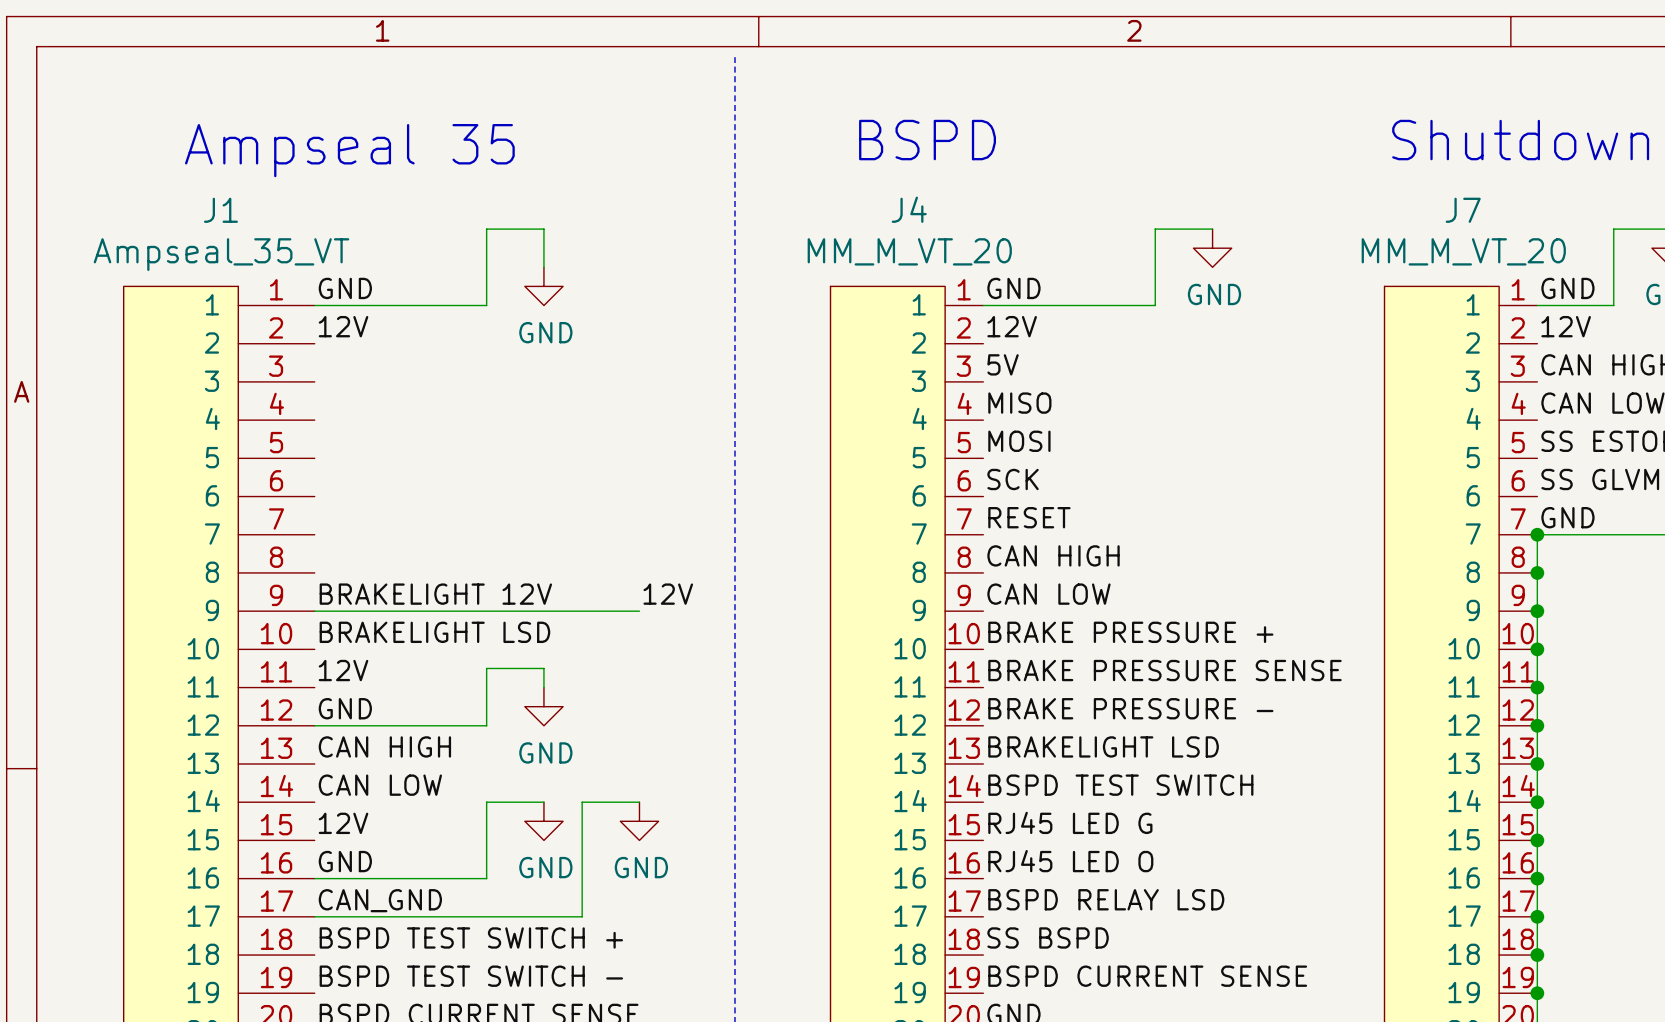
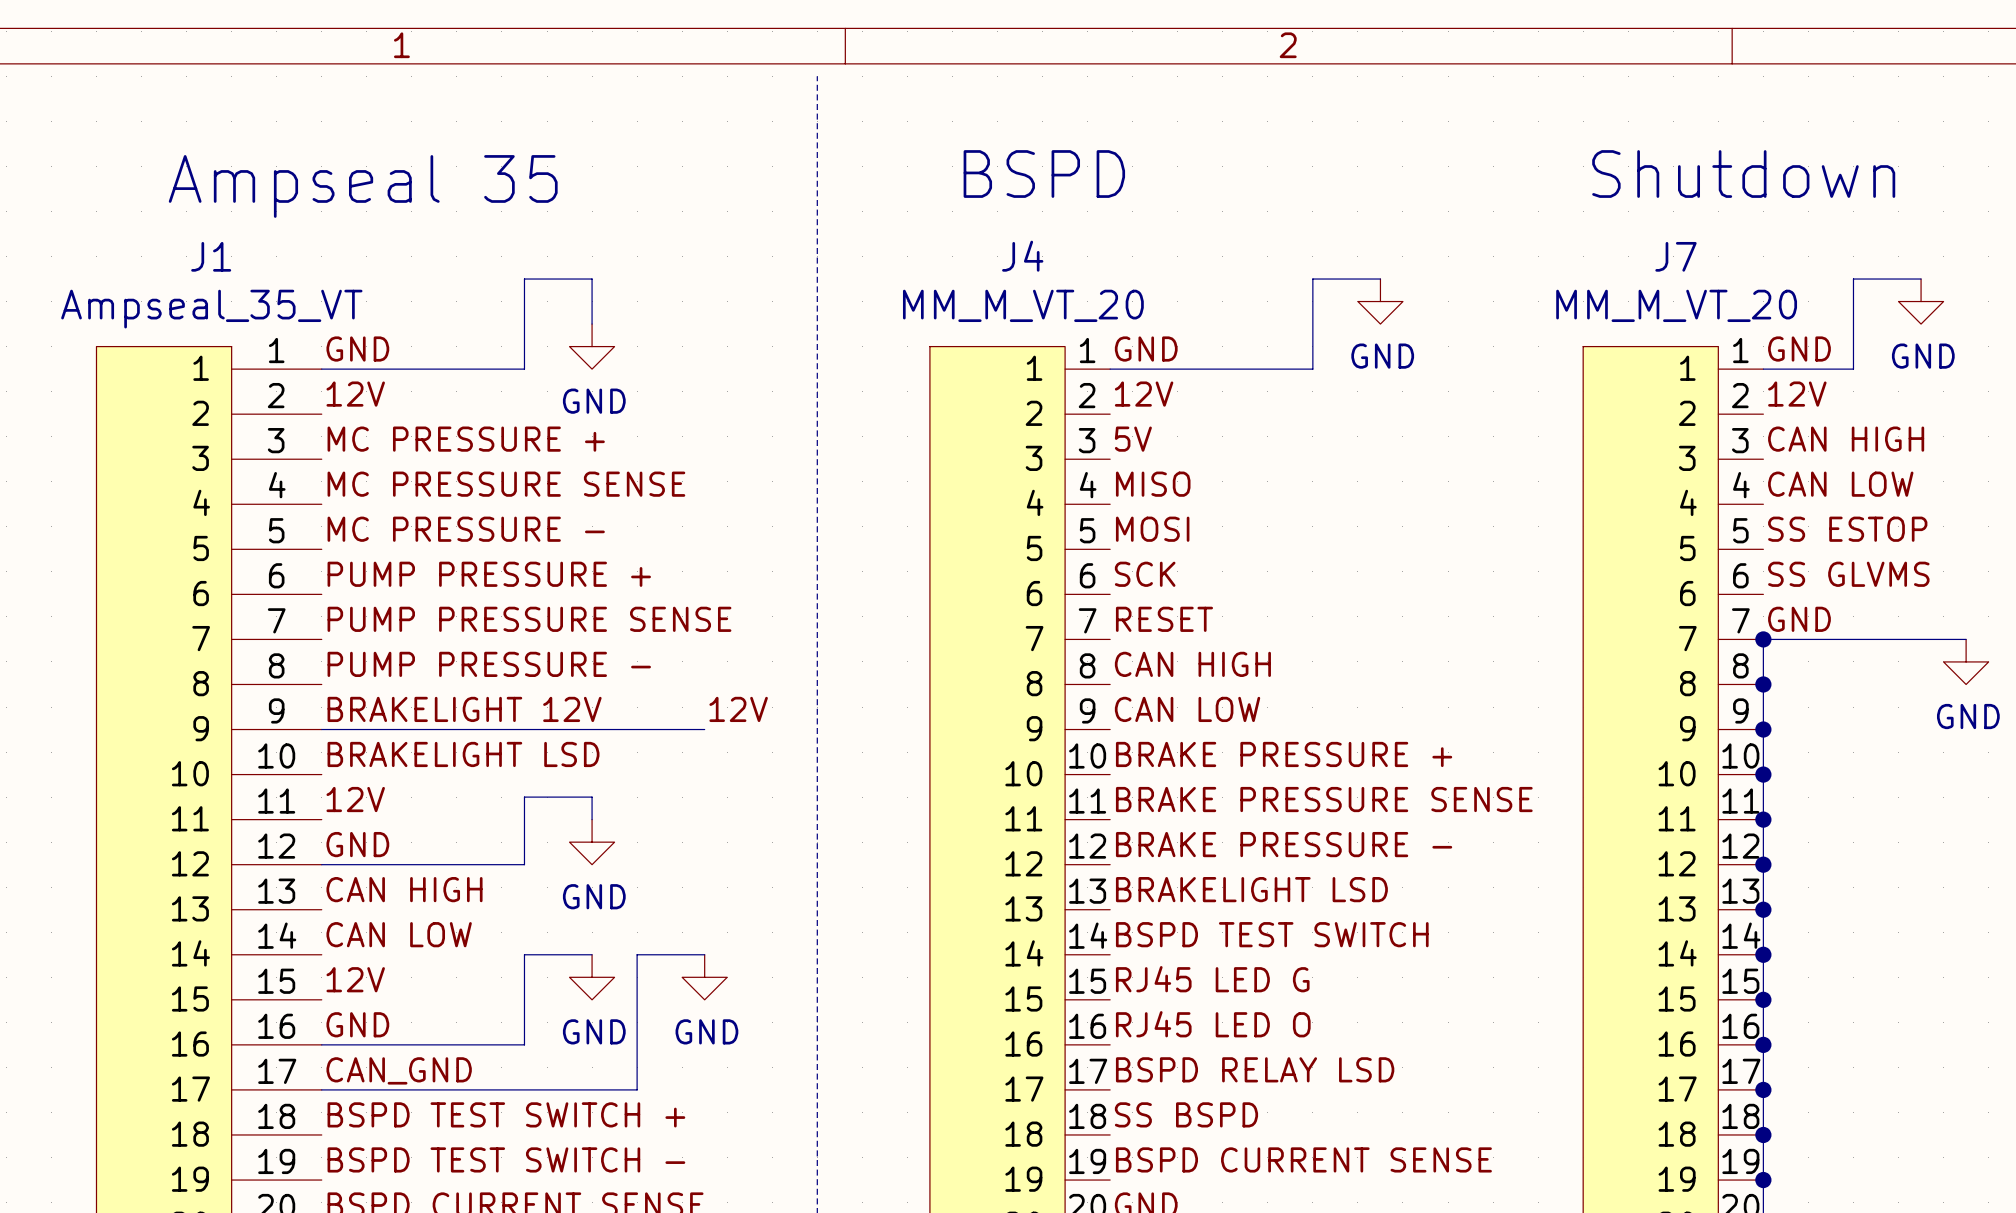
label: none -> MC PRESSURE + (466, 439)
label: none -> MC PRESSURE SENSE (506, 484)
label: none -> MC PRESSURE - (466, 529)
label: none -> PUMP PRESSURE + (489, 574)
label: none -> PUMP PRESSURE SENSE (529, 619)
label: none -> PUMP PRESSURE - (489, 664)

